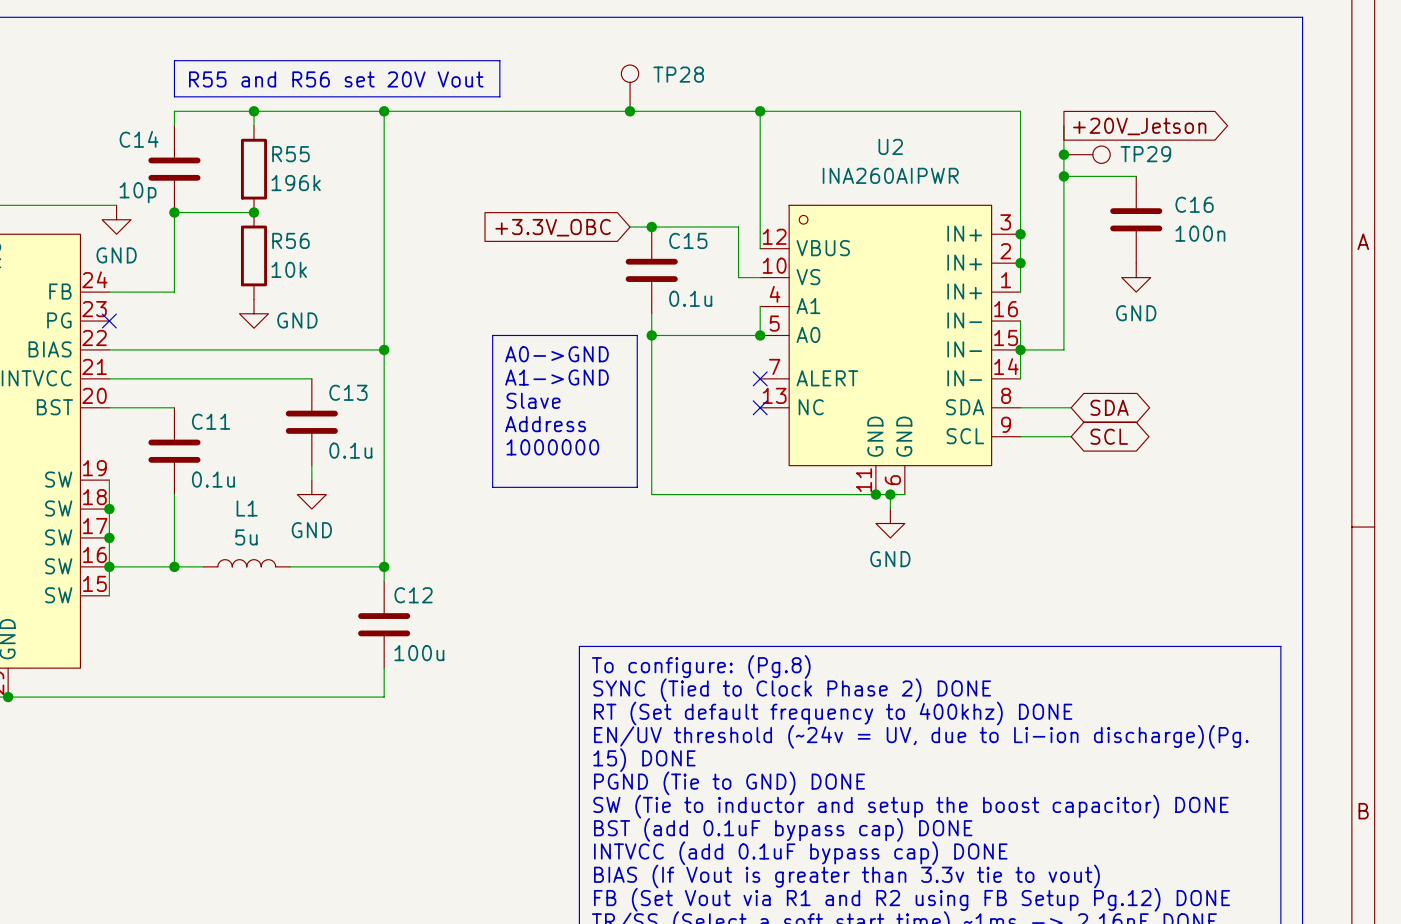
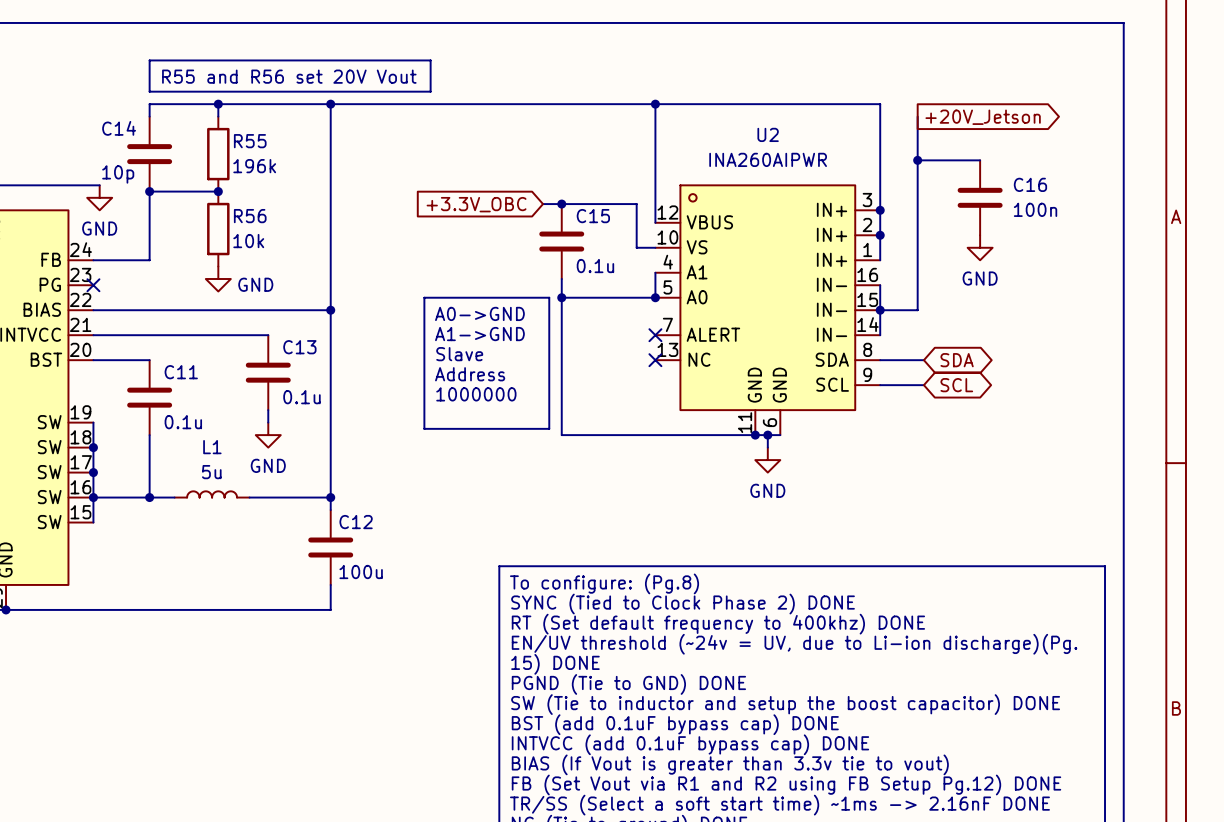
TP28: (630, 88) -> none
junction: (630, 111) -> none
junction: (1063, 154) -> none
TP29: (1087, 154) -> none

